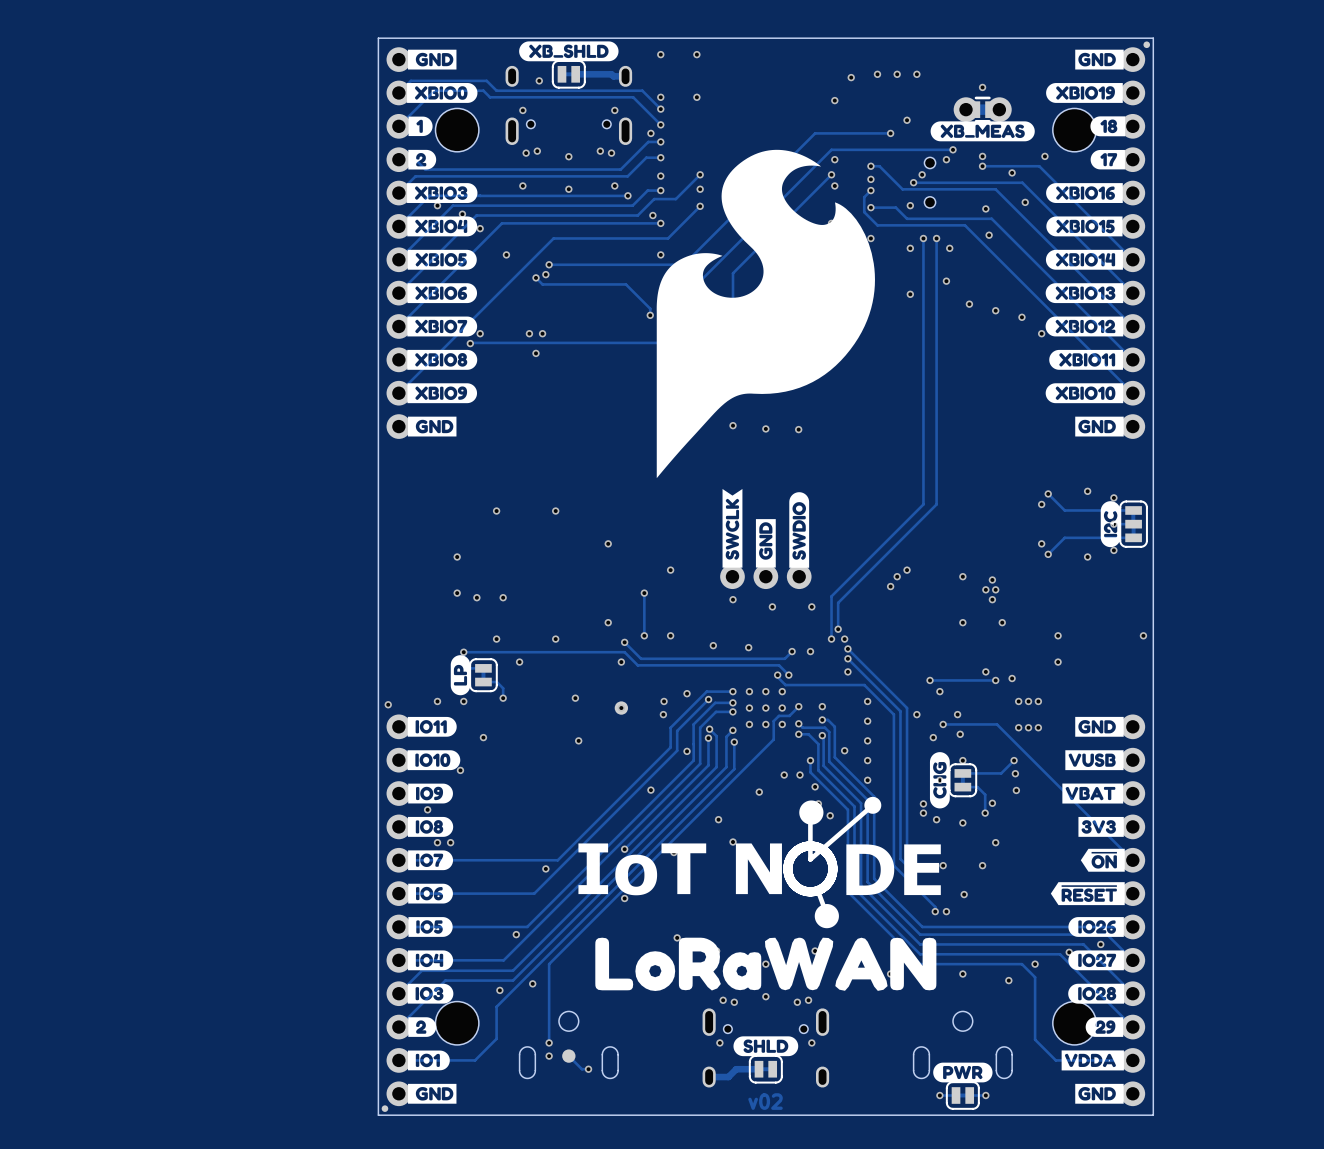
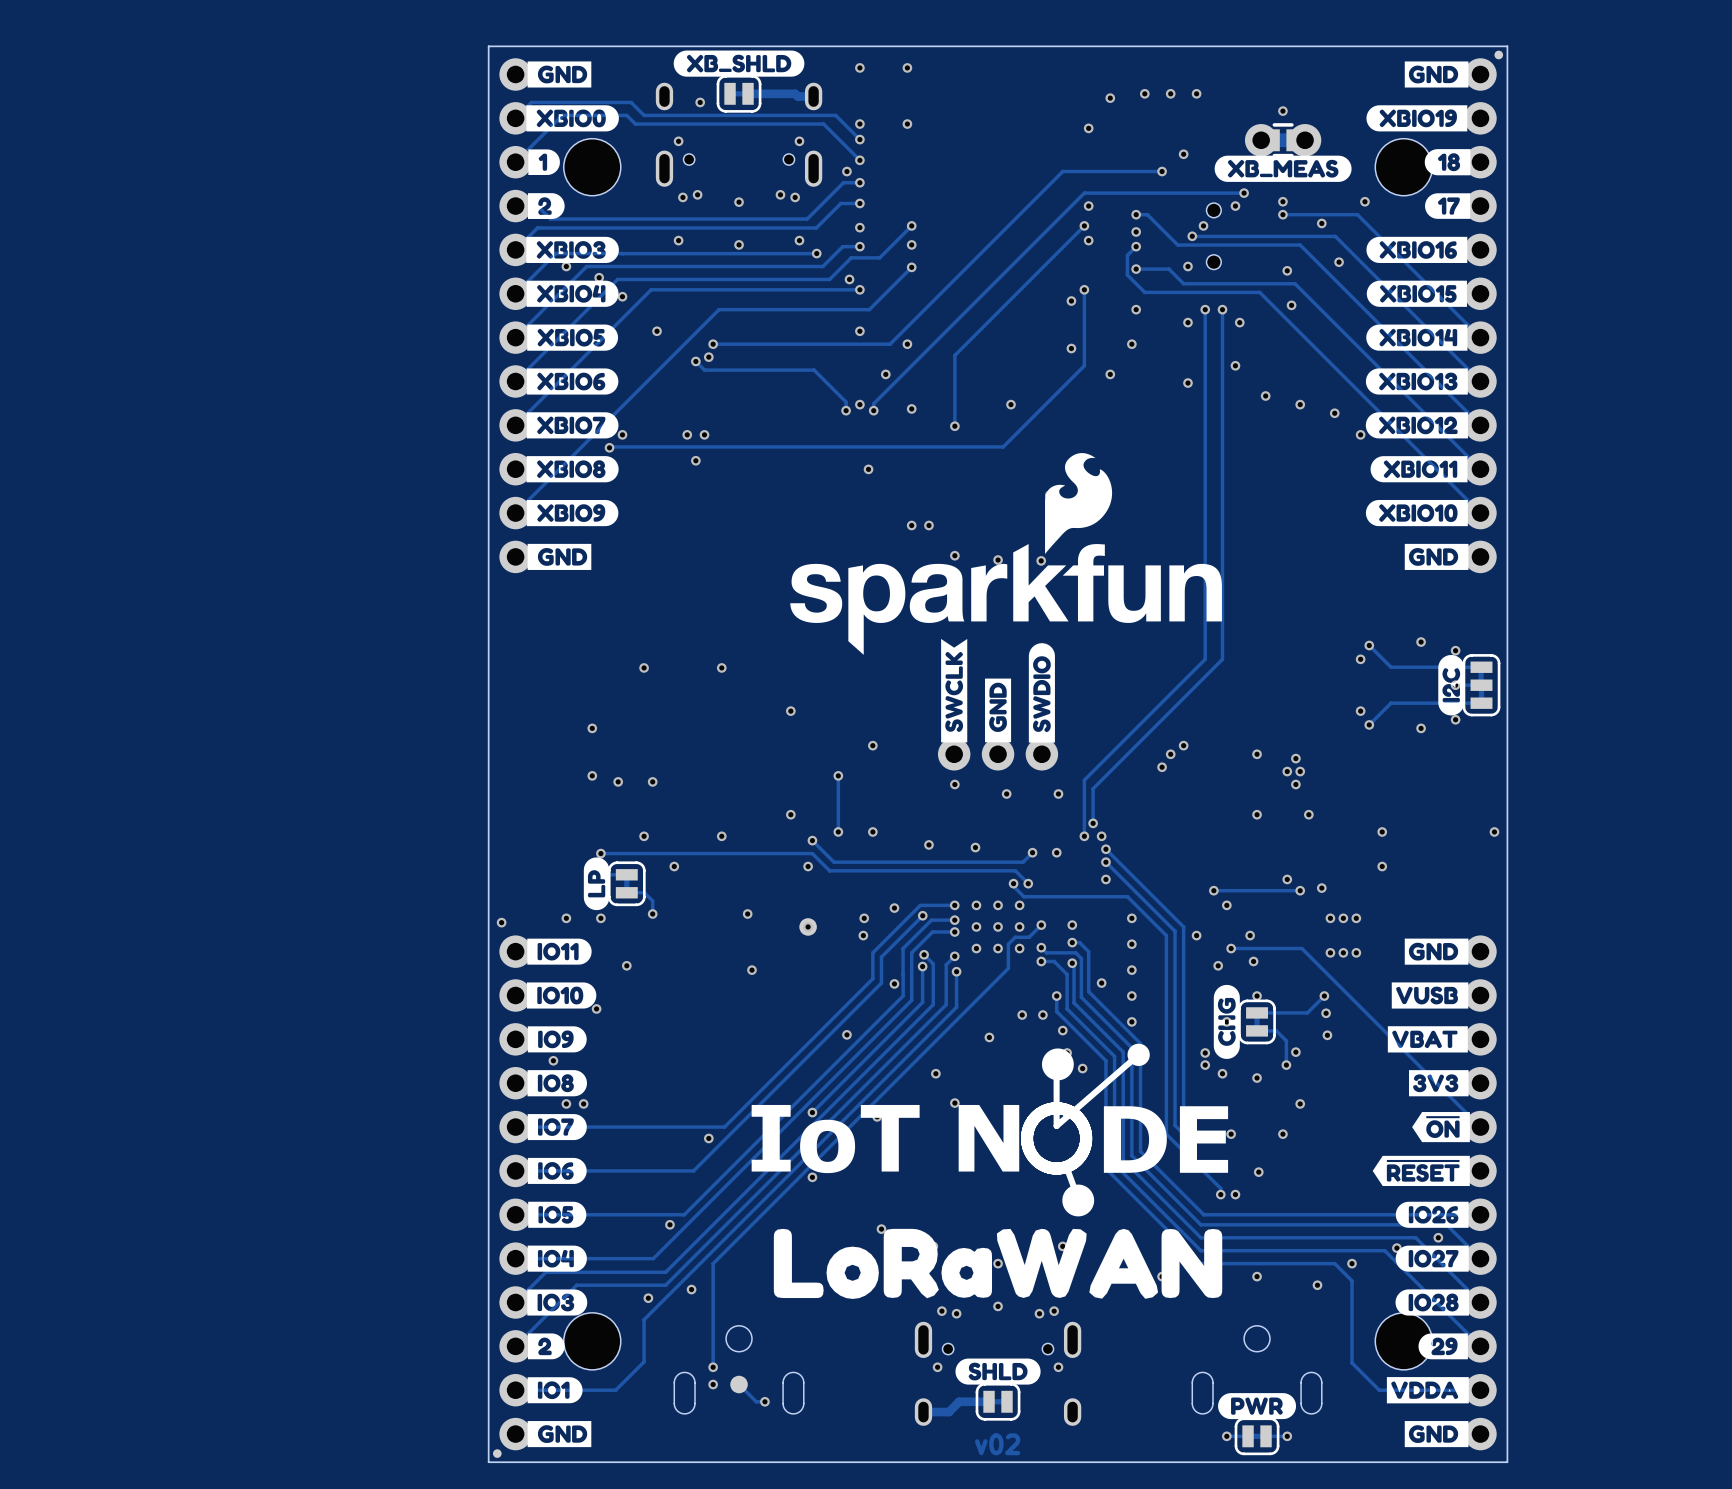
drawing: [656, 149, 875, 479] -> none
drawing: none -> [790, 453, 1222, 655]

